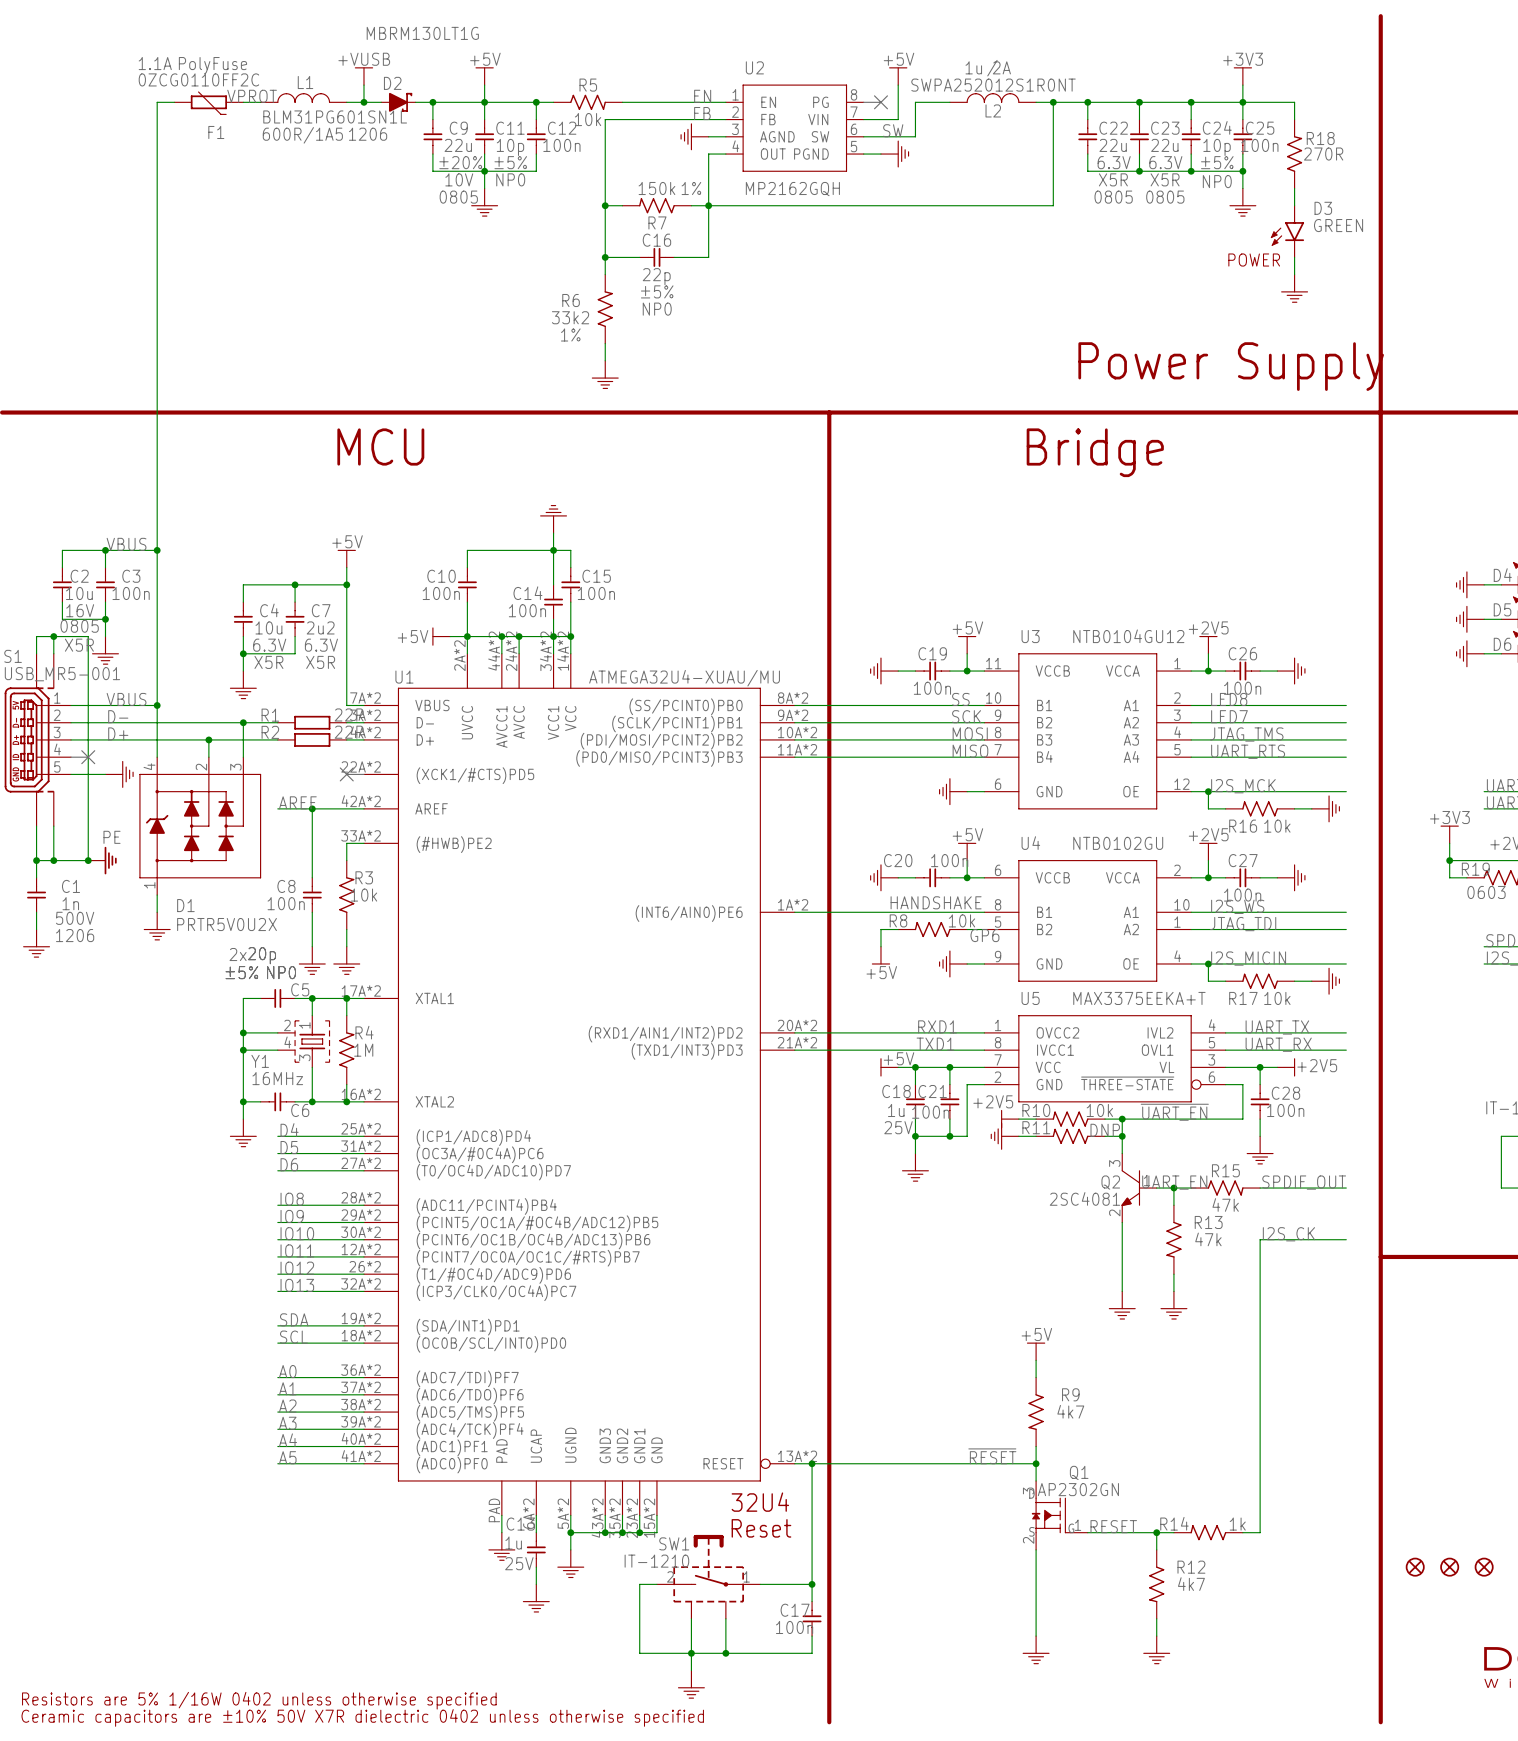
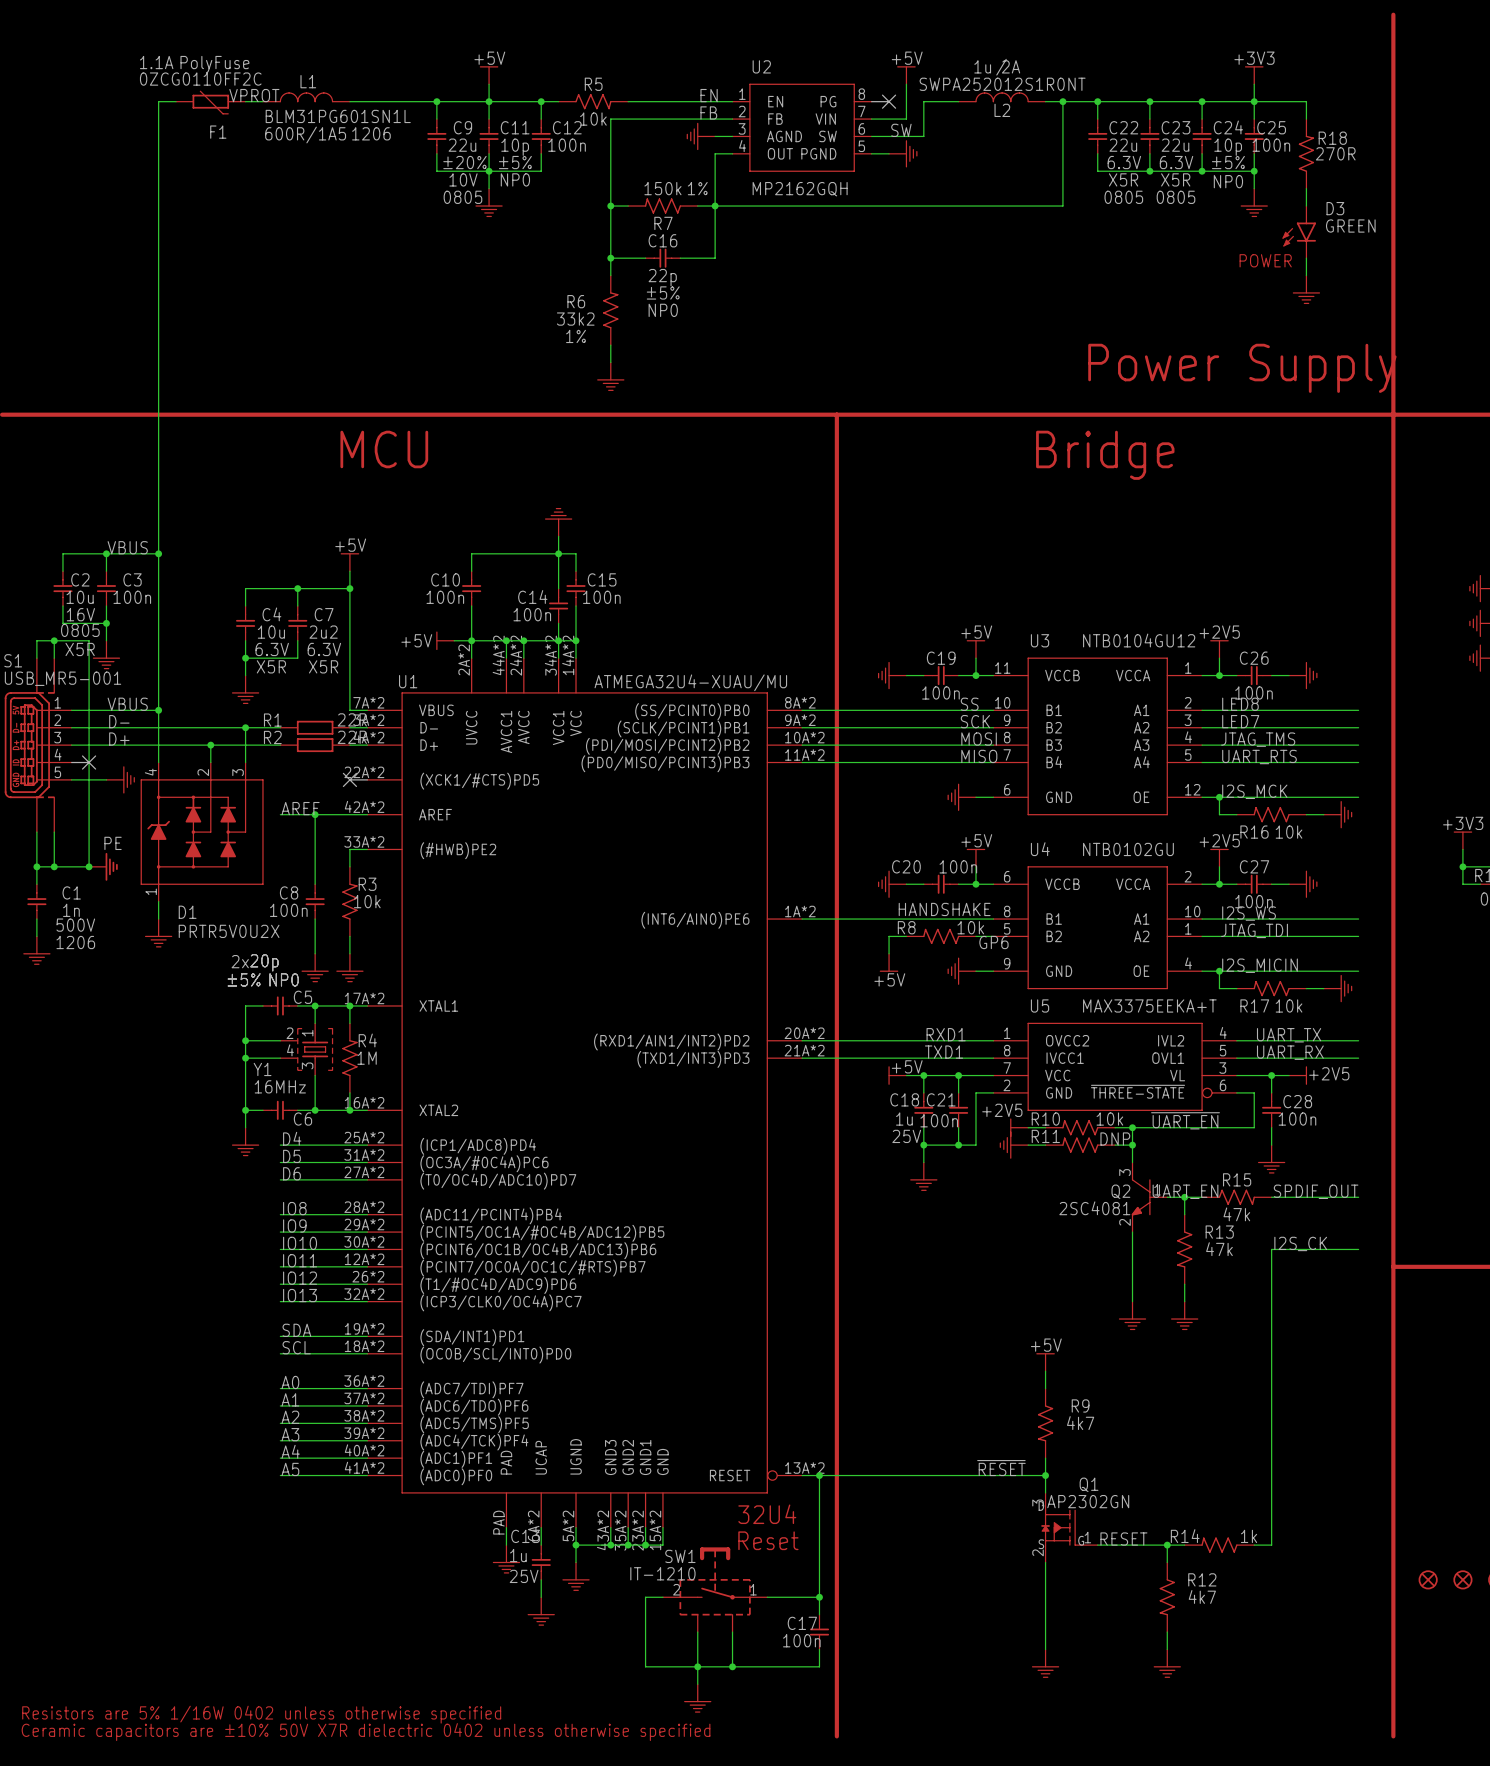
power symbol: +VUSB (363, 76) -> none
wire: (363, 85) (363, 102) -> none
junction: (363, 102) -> none
D2: MBRM130LT1G (398, 102) -> none

